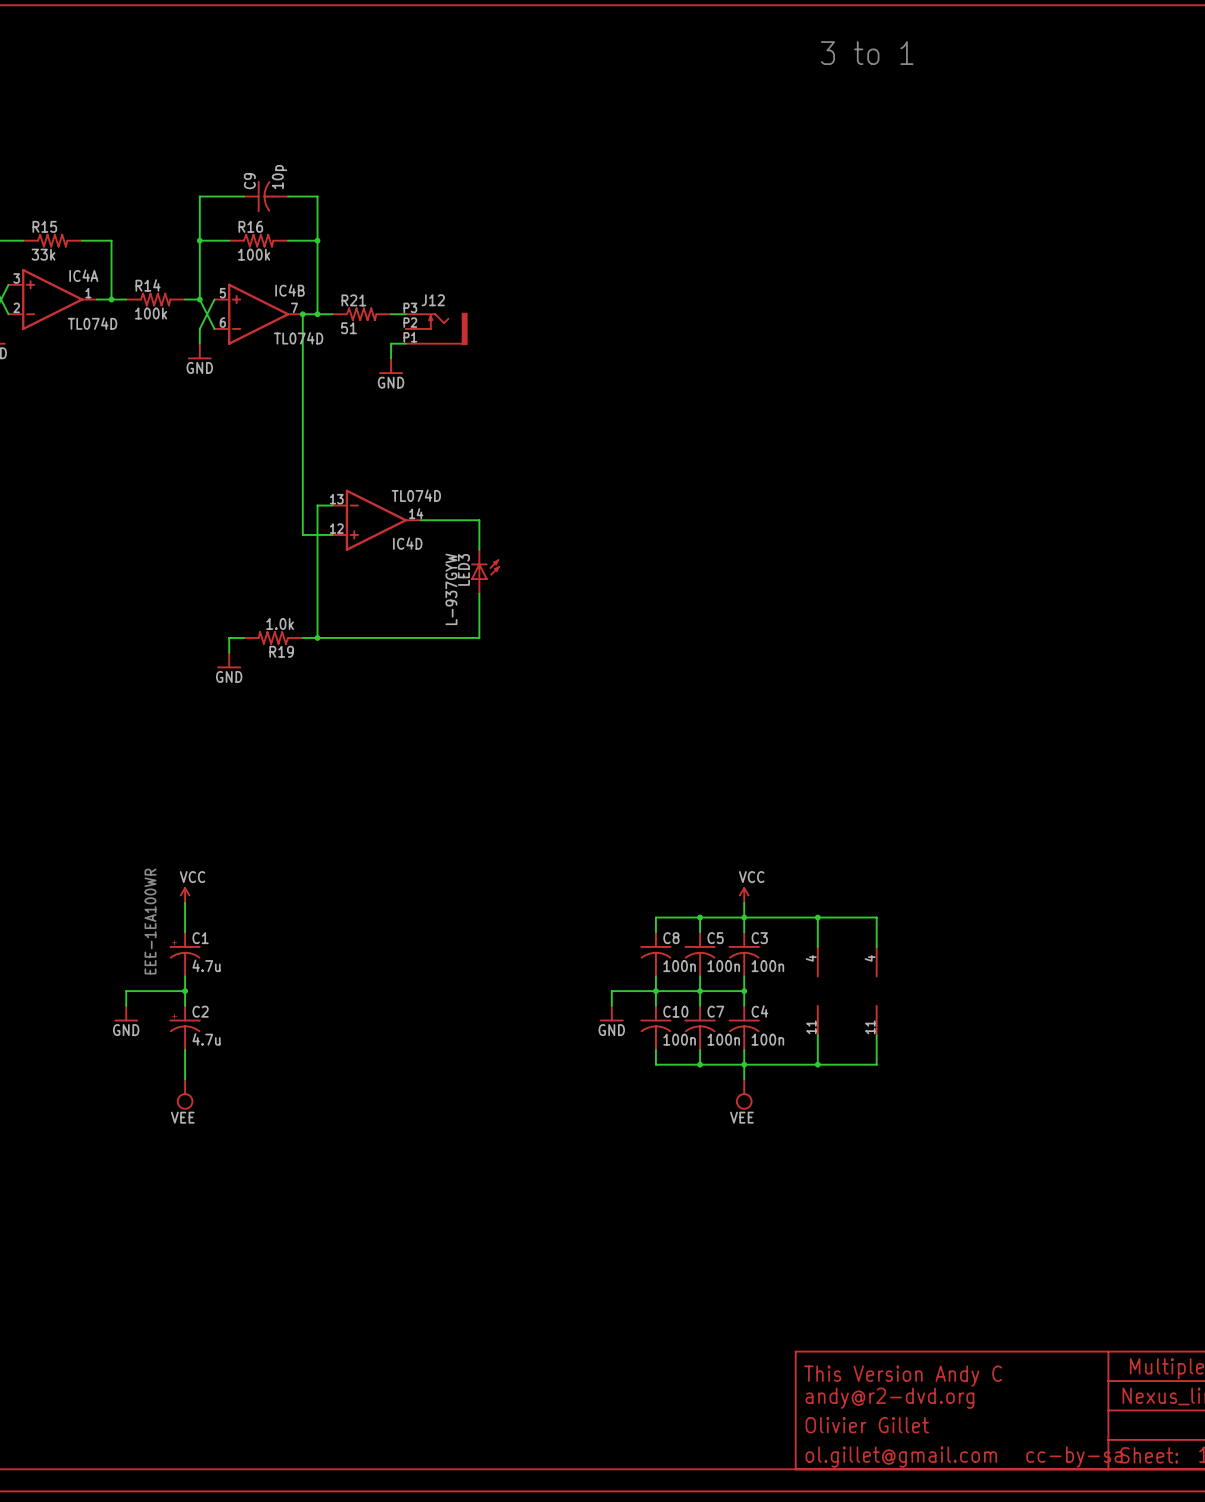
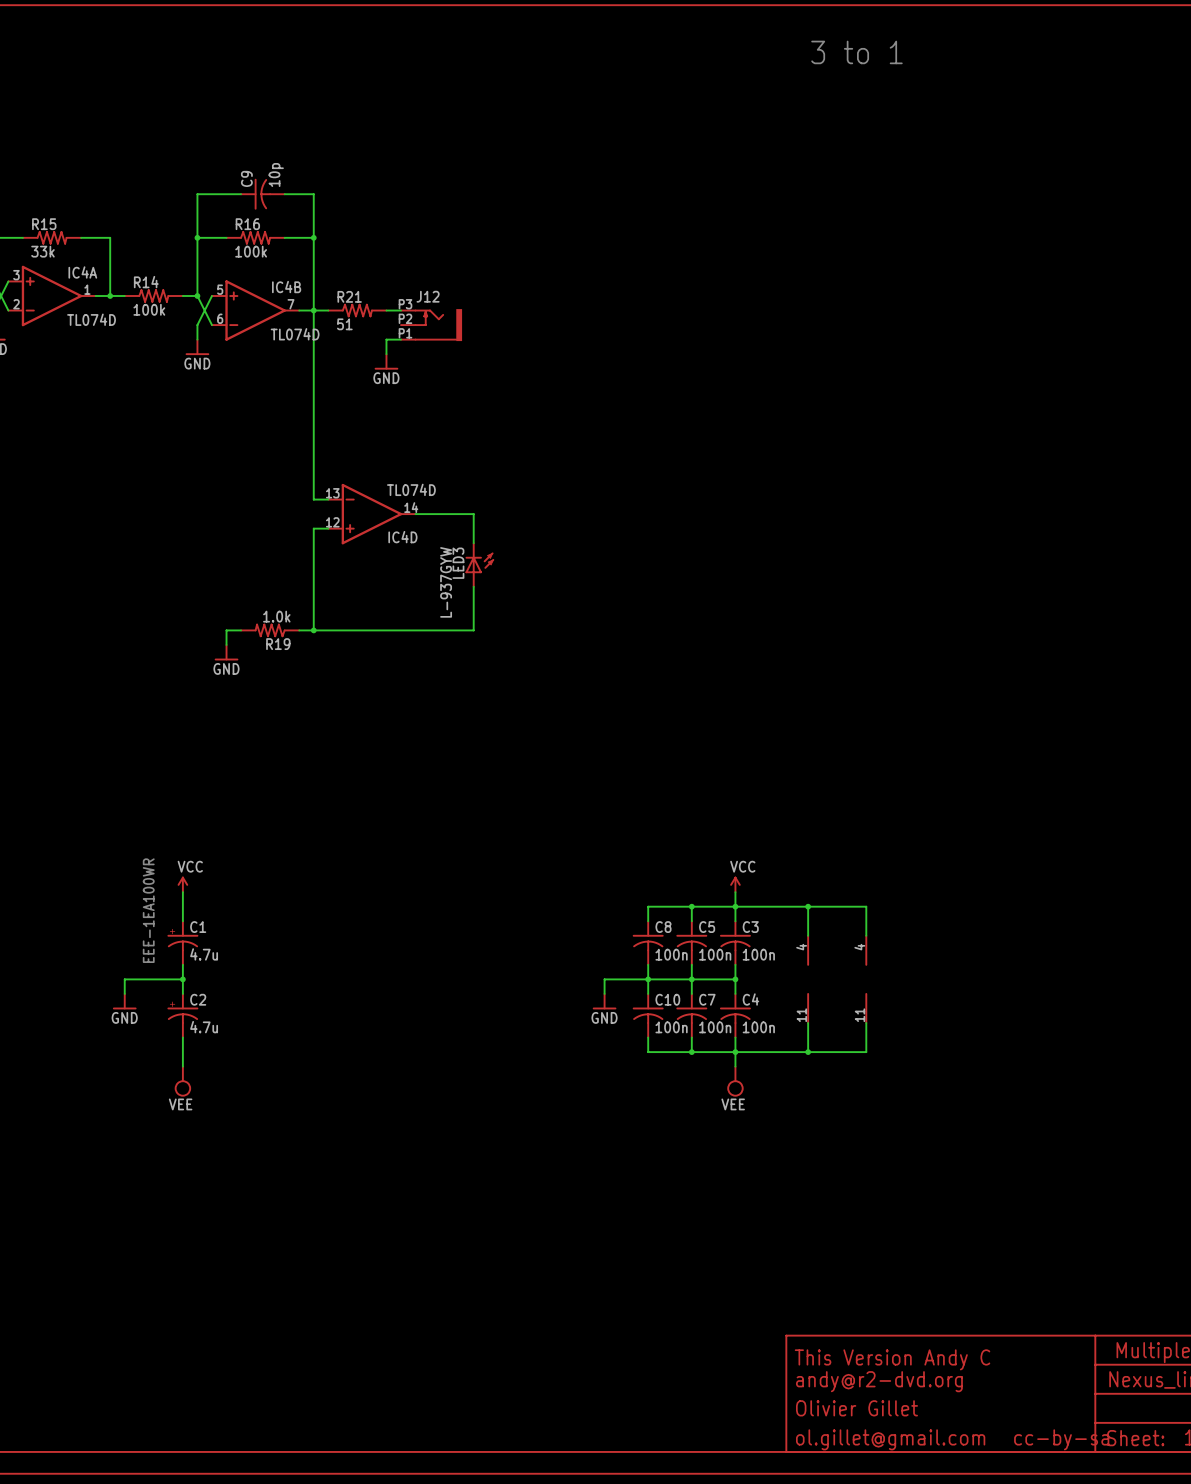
wire: (302, 314) (302, 534) (317, 534) (317, 505) -> (313, 310) (313, 499)
junction: (302, 314) -> none

